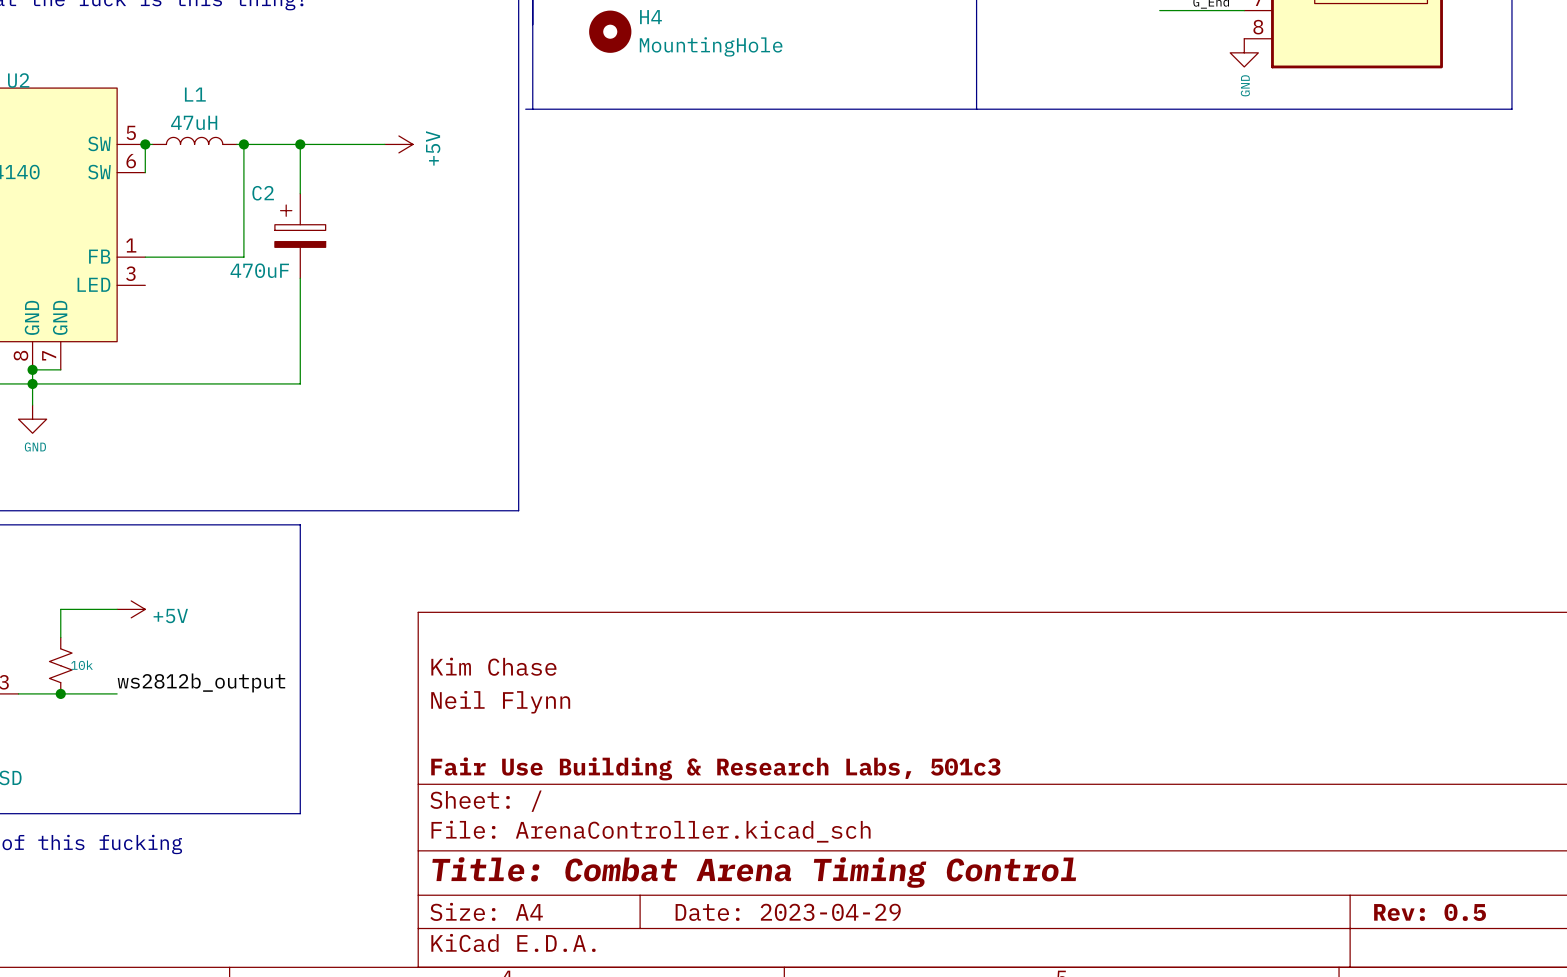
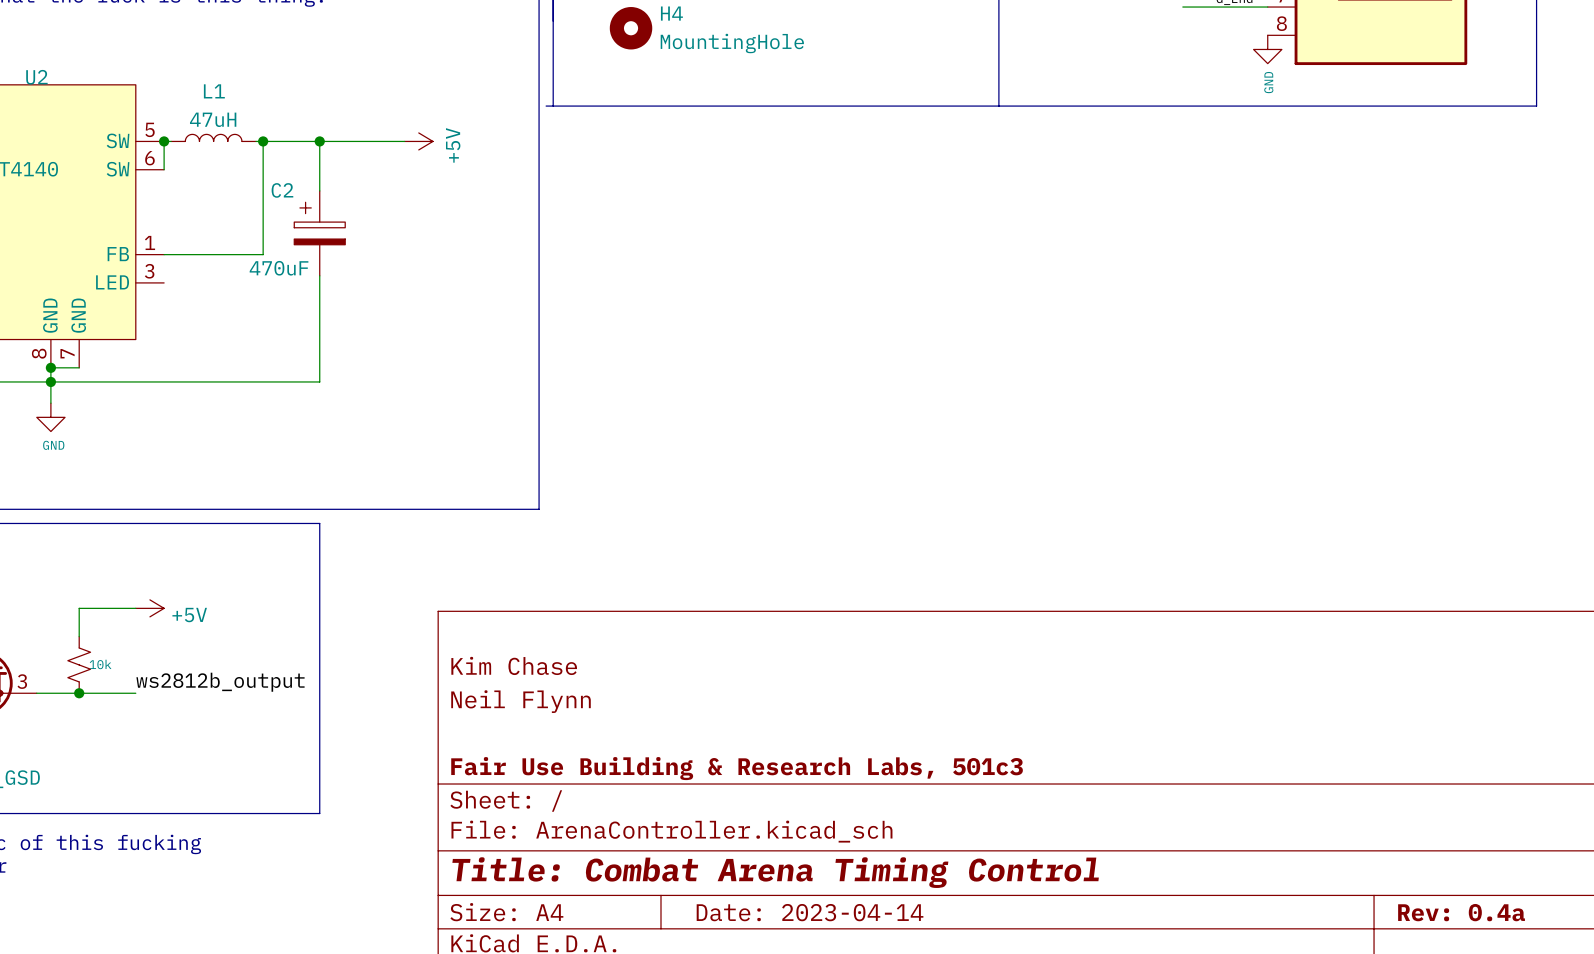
title block: Date: 2023-04-29 (788, 912) -> Date: 2023-04-14 (810, 912)
title block: Rev: 0.5 (1430, 912) -> Rev: 0.4a (1461, 912)

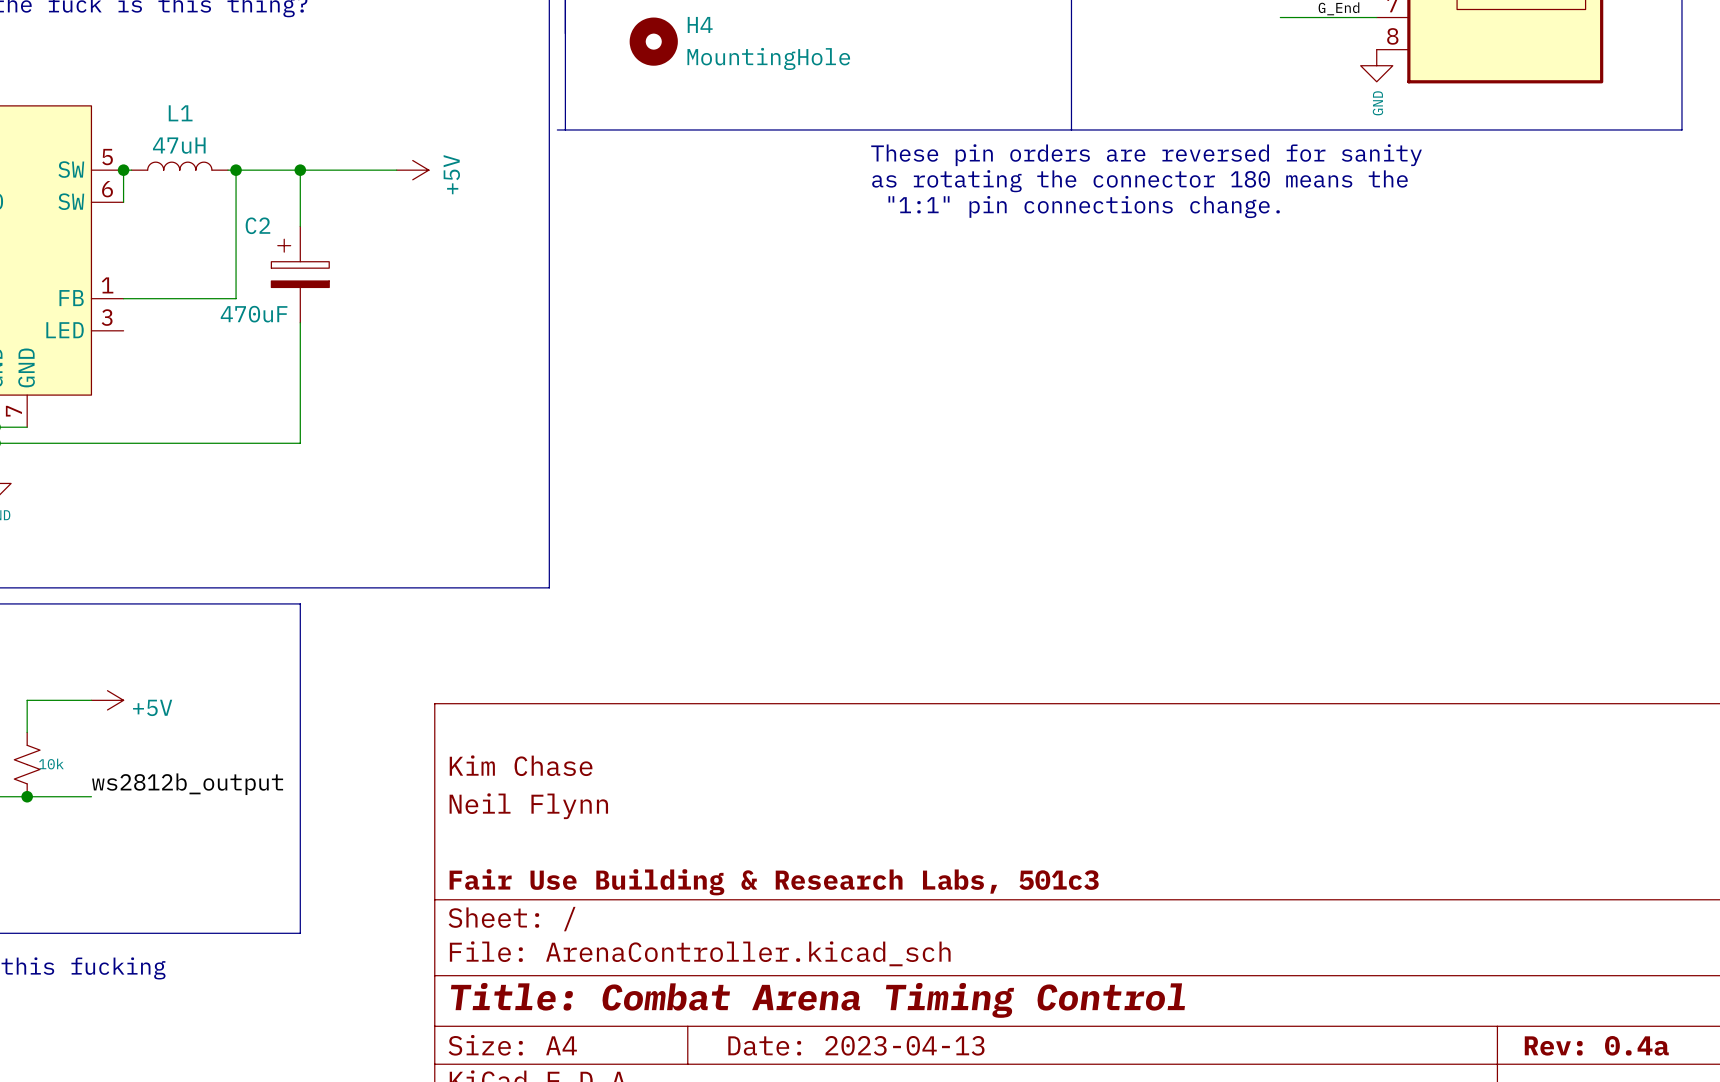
text: none -> These pin orders are reversed for sanity (1146, 155)
text: none -> as rotating the connector 180 means the (1139, 181)
text: none -> "1:1" pin connections change. (1084, 207)
title block: Date: 2023-04-14 (810, 912) -> Date: 2023-04-13 (856, 1045)

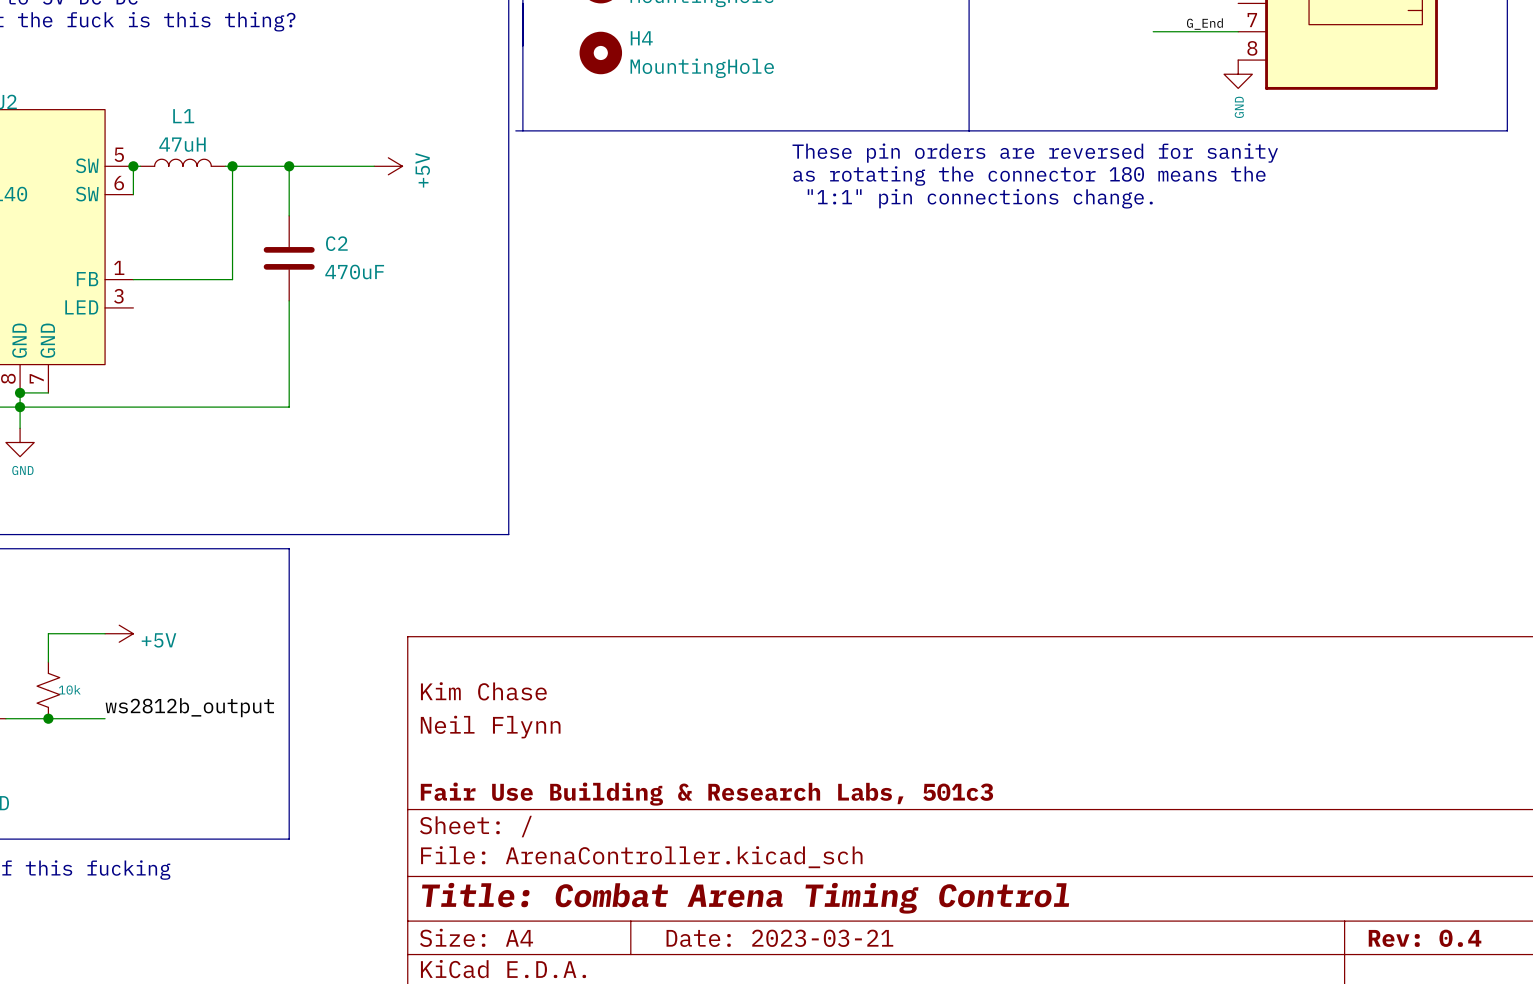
C2 name position: C2 (257, 225) -> C2 (336, 243)
C2 symbol: [271, 226, 330, 323] -> [263, 215, 315, 301]
C2 value position: 470uF (254, 314) -> 470uF (354, 272)
title block: Date: 2023-04-13 (856, 1045) -> Date: 2023-03-21 (779, 938)
title block: Rev: 0.4a (1596, 1045) -> Rev: 0.4 (1425, 938)

